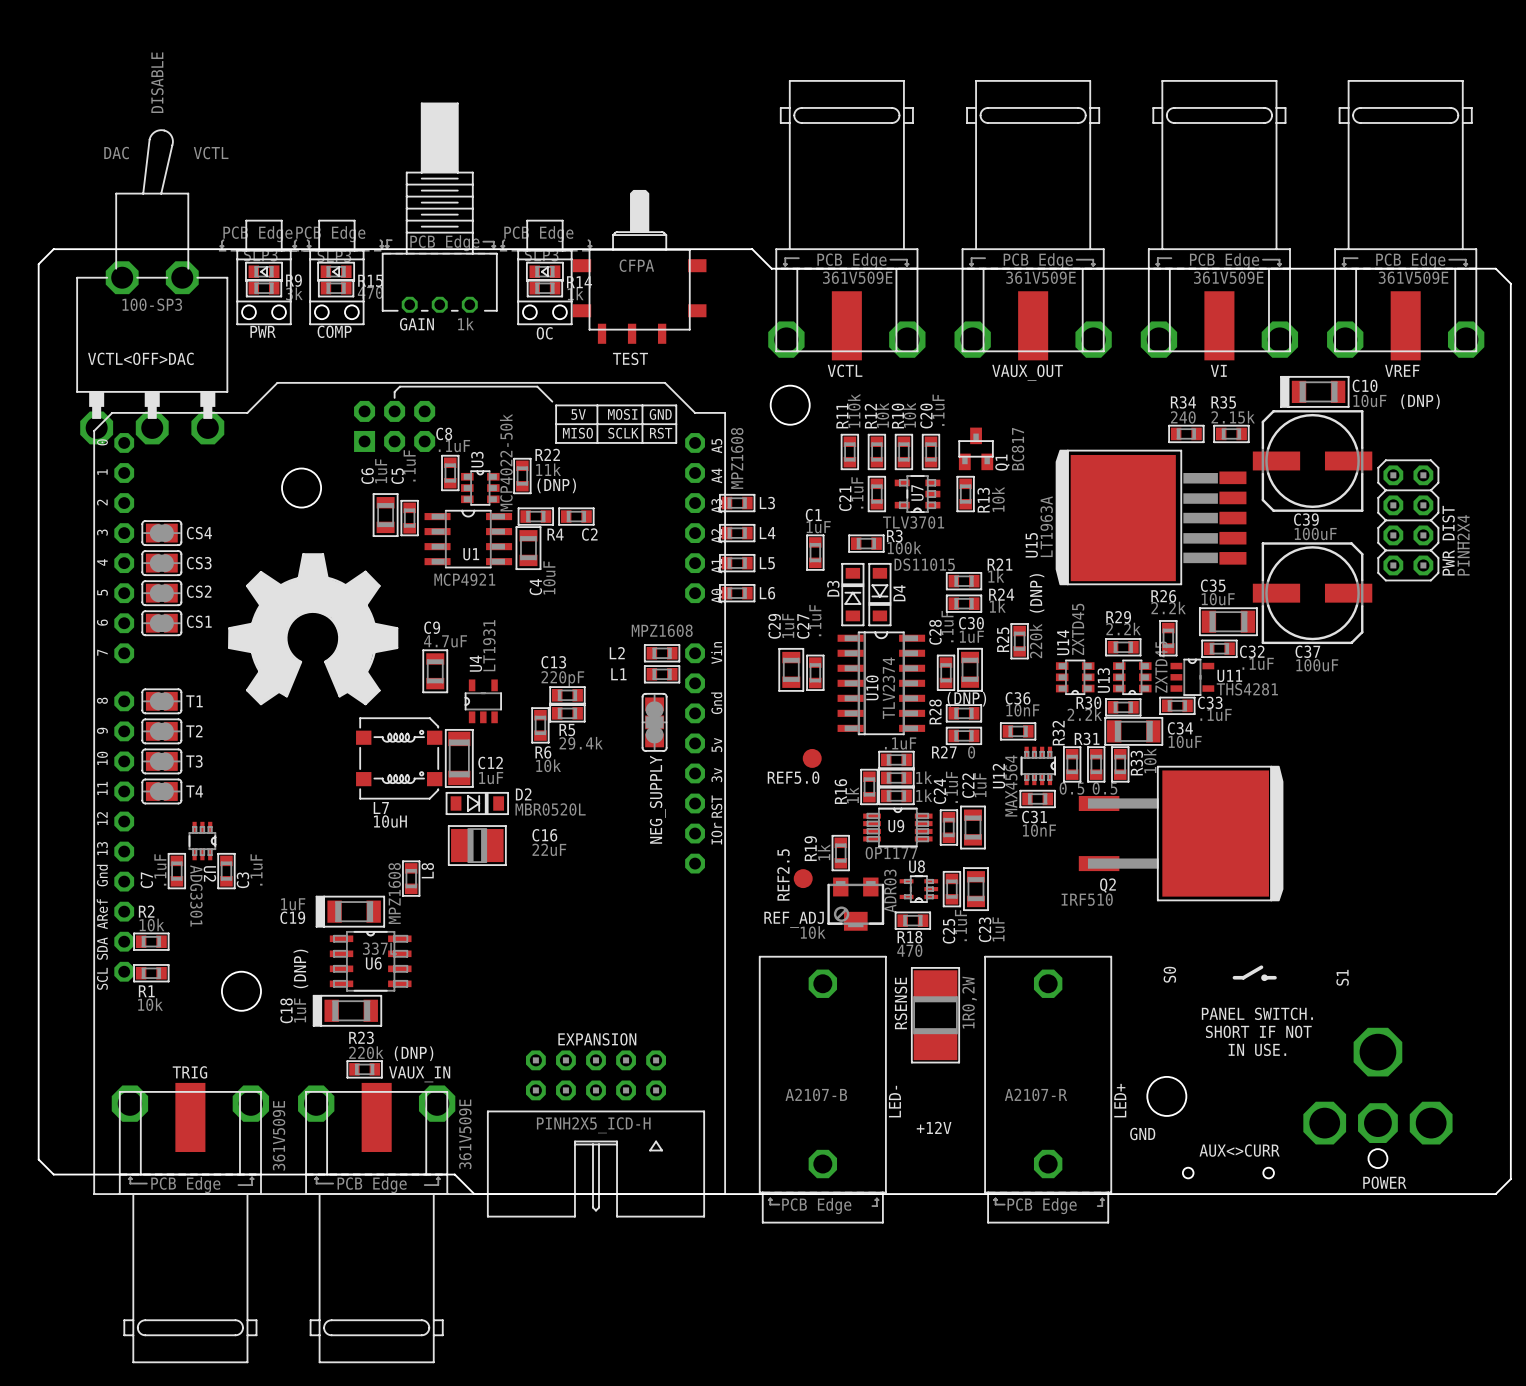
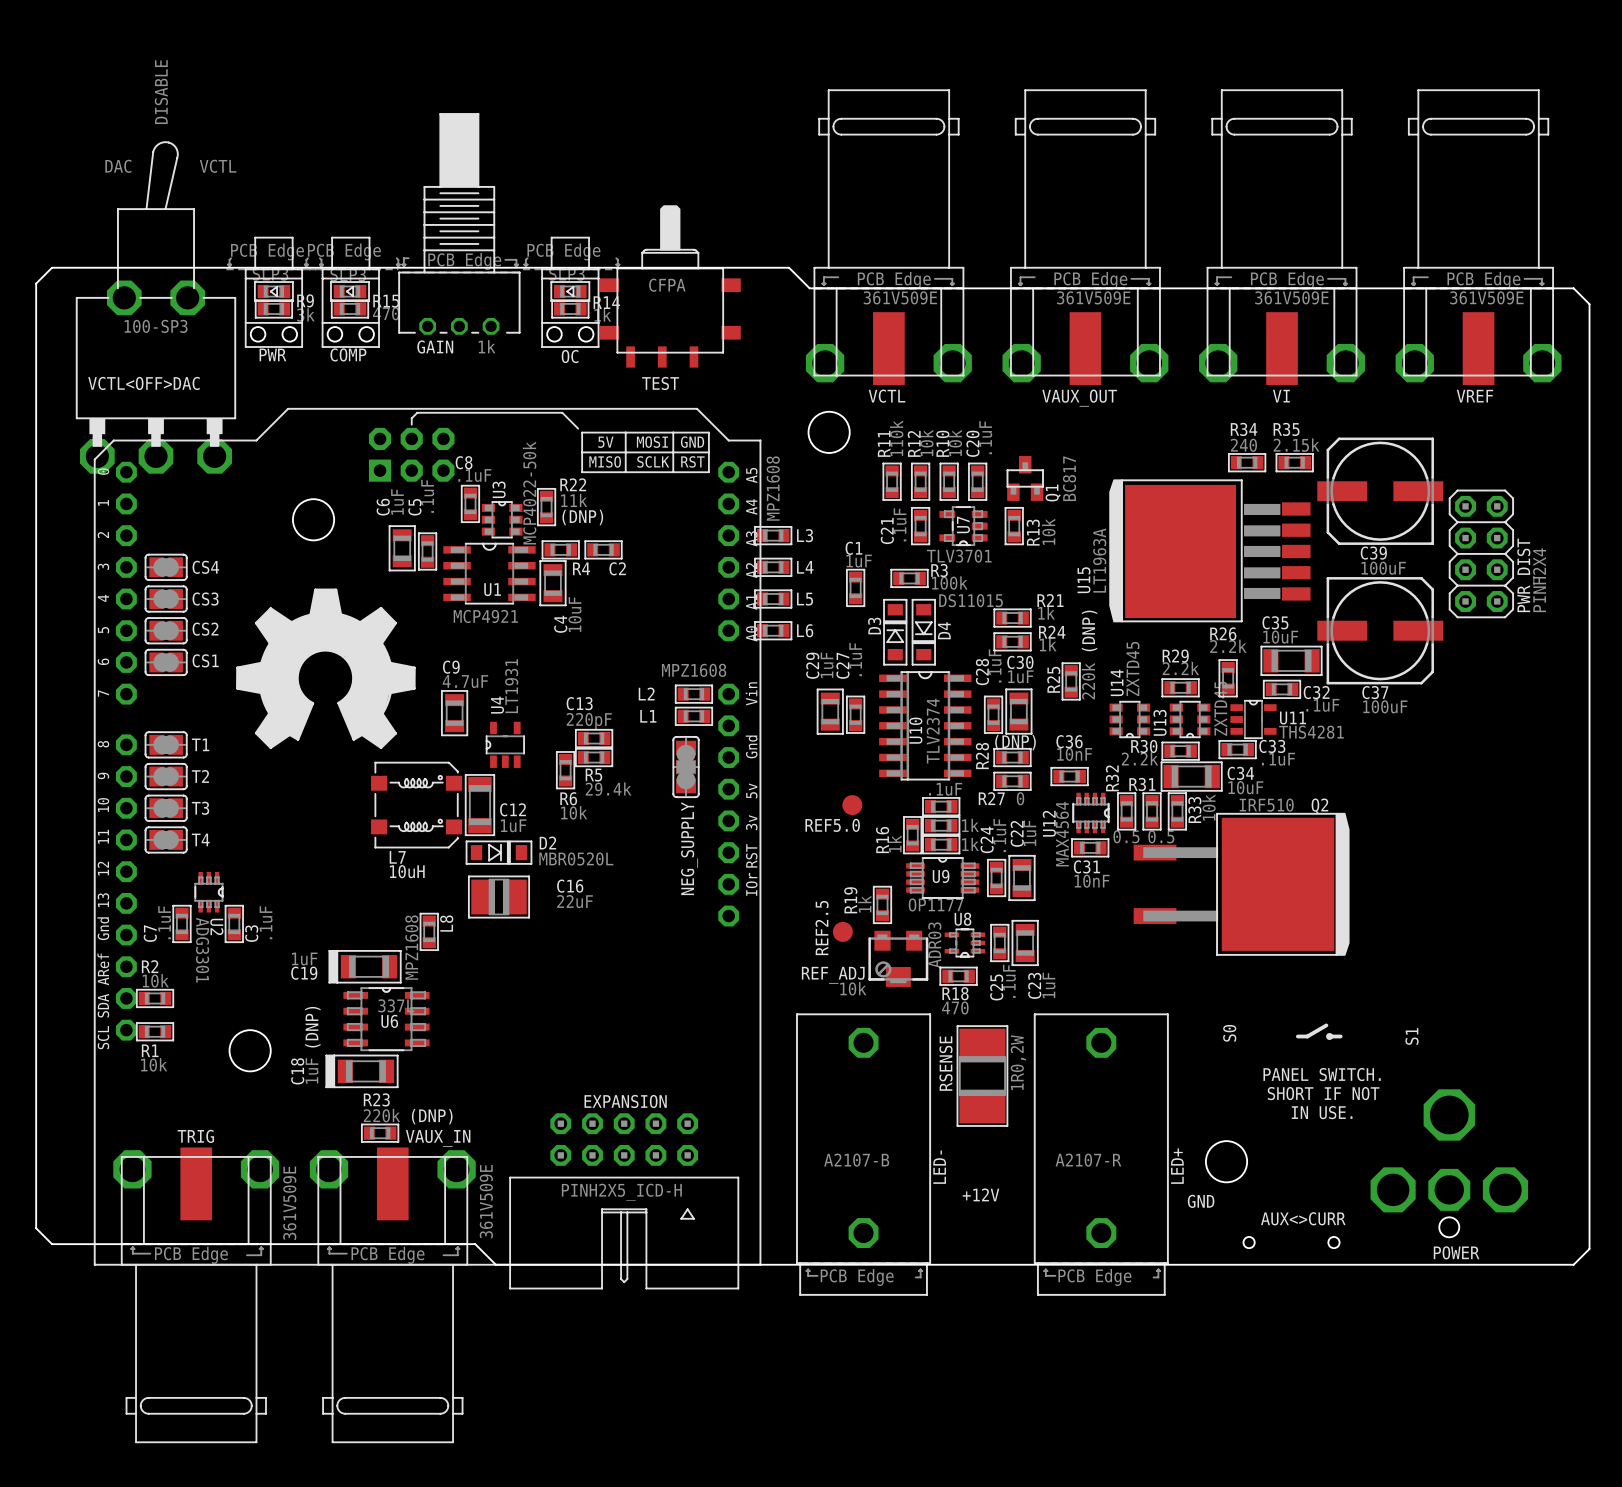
C10: 10uF (1314, 391) -> none
text: (DNP) (1420, 401) -> none
Q2 name position: Q2 (1107, 885) -> Q2 (1319, 806)
Q2 value position: IRF510 (1087, 899) -> IRF510 (1266, 805)

